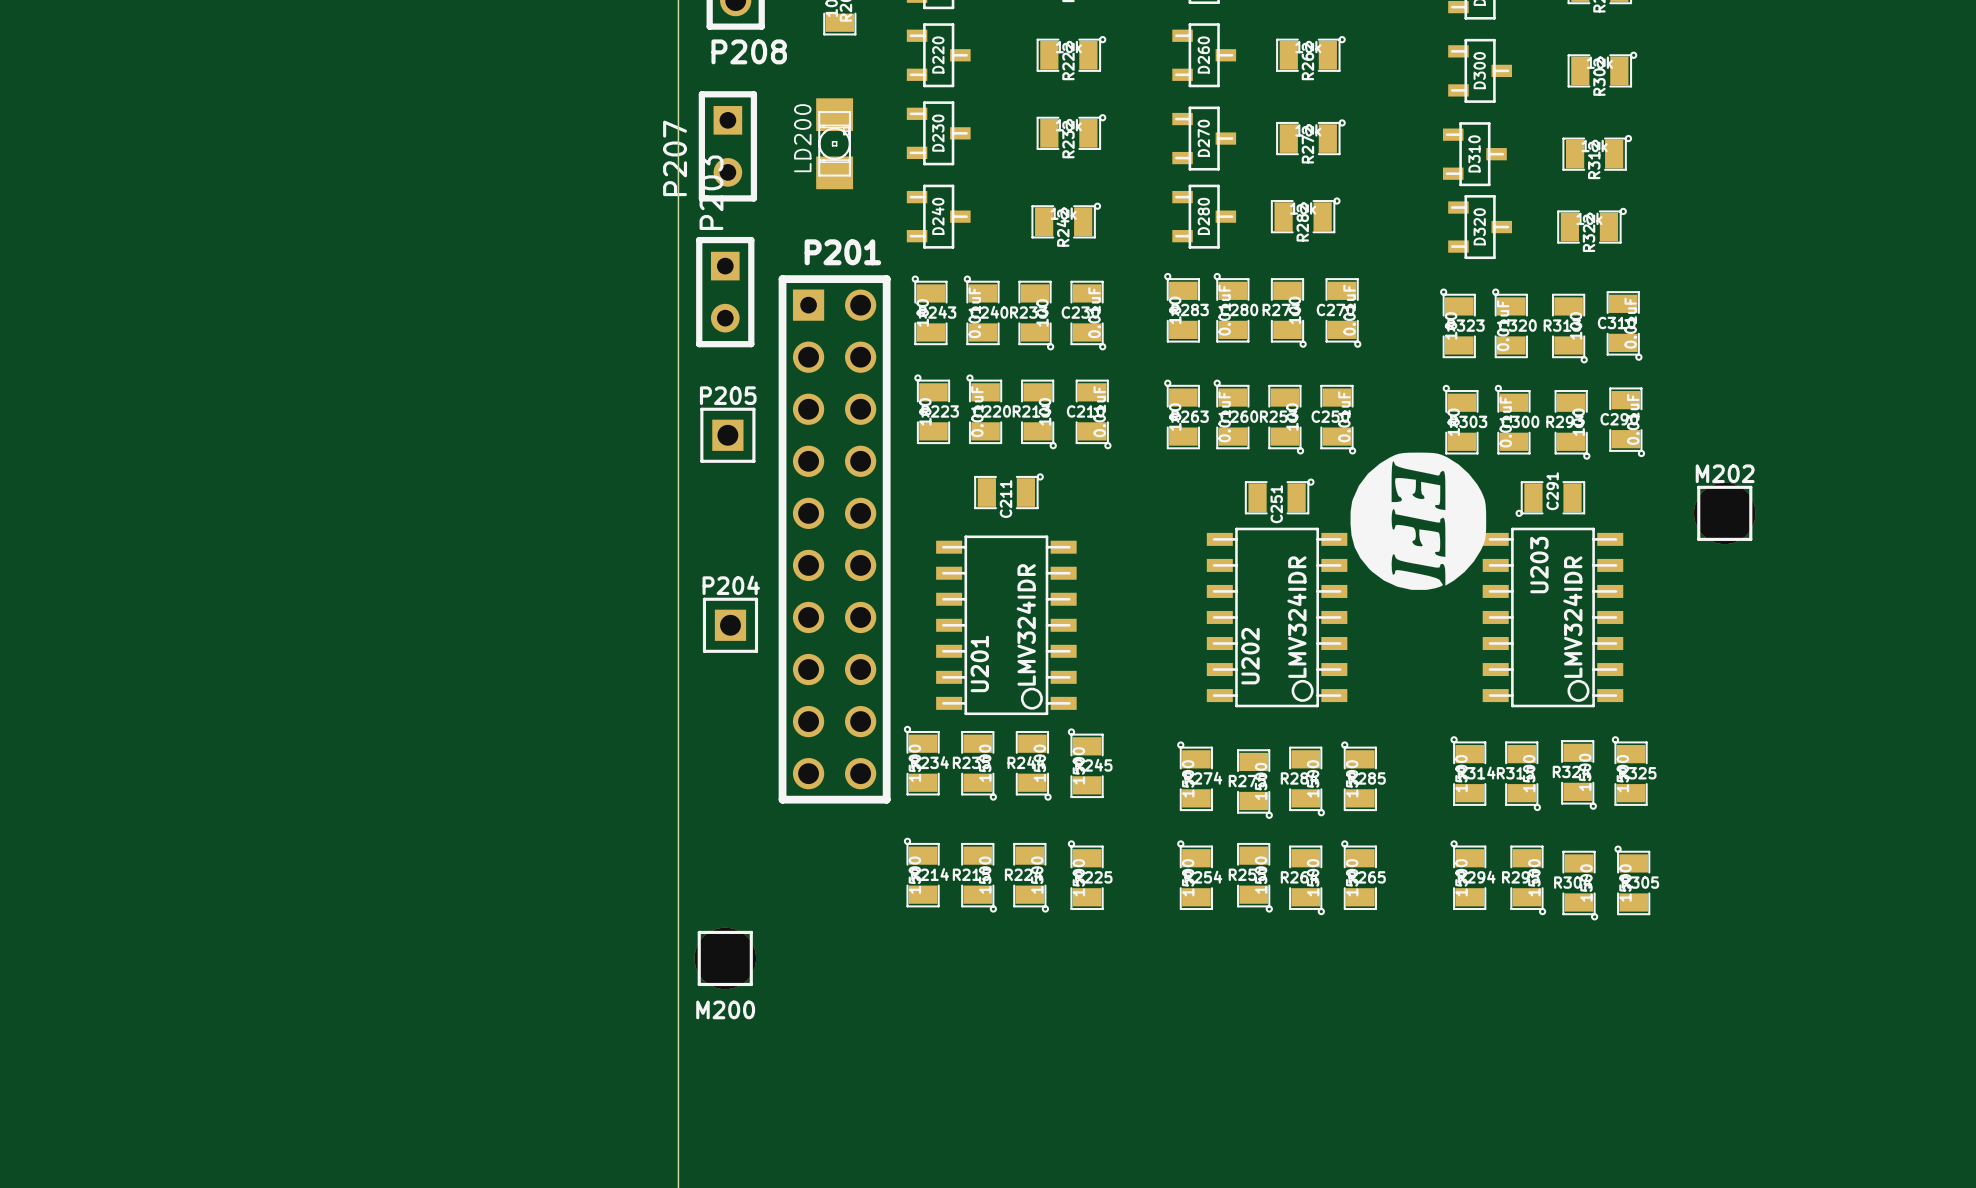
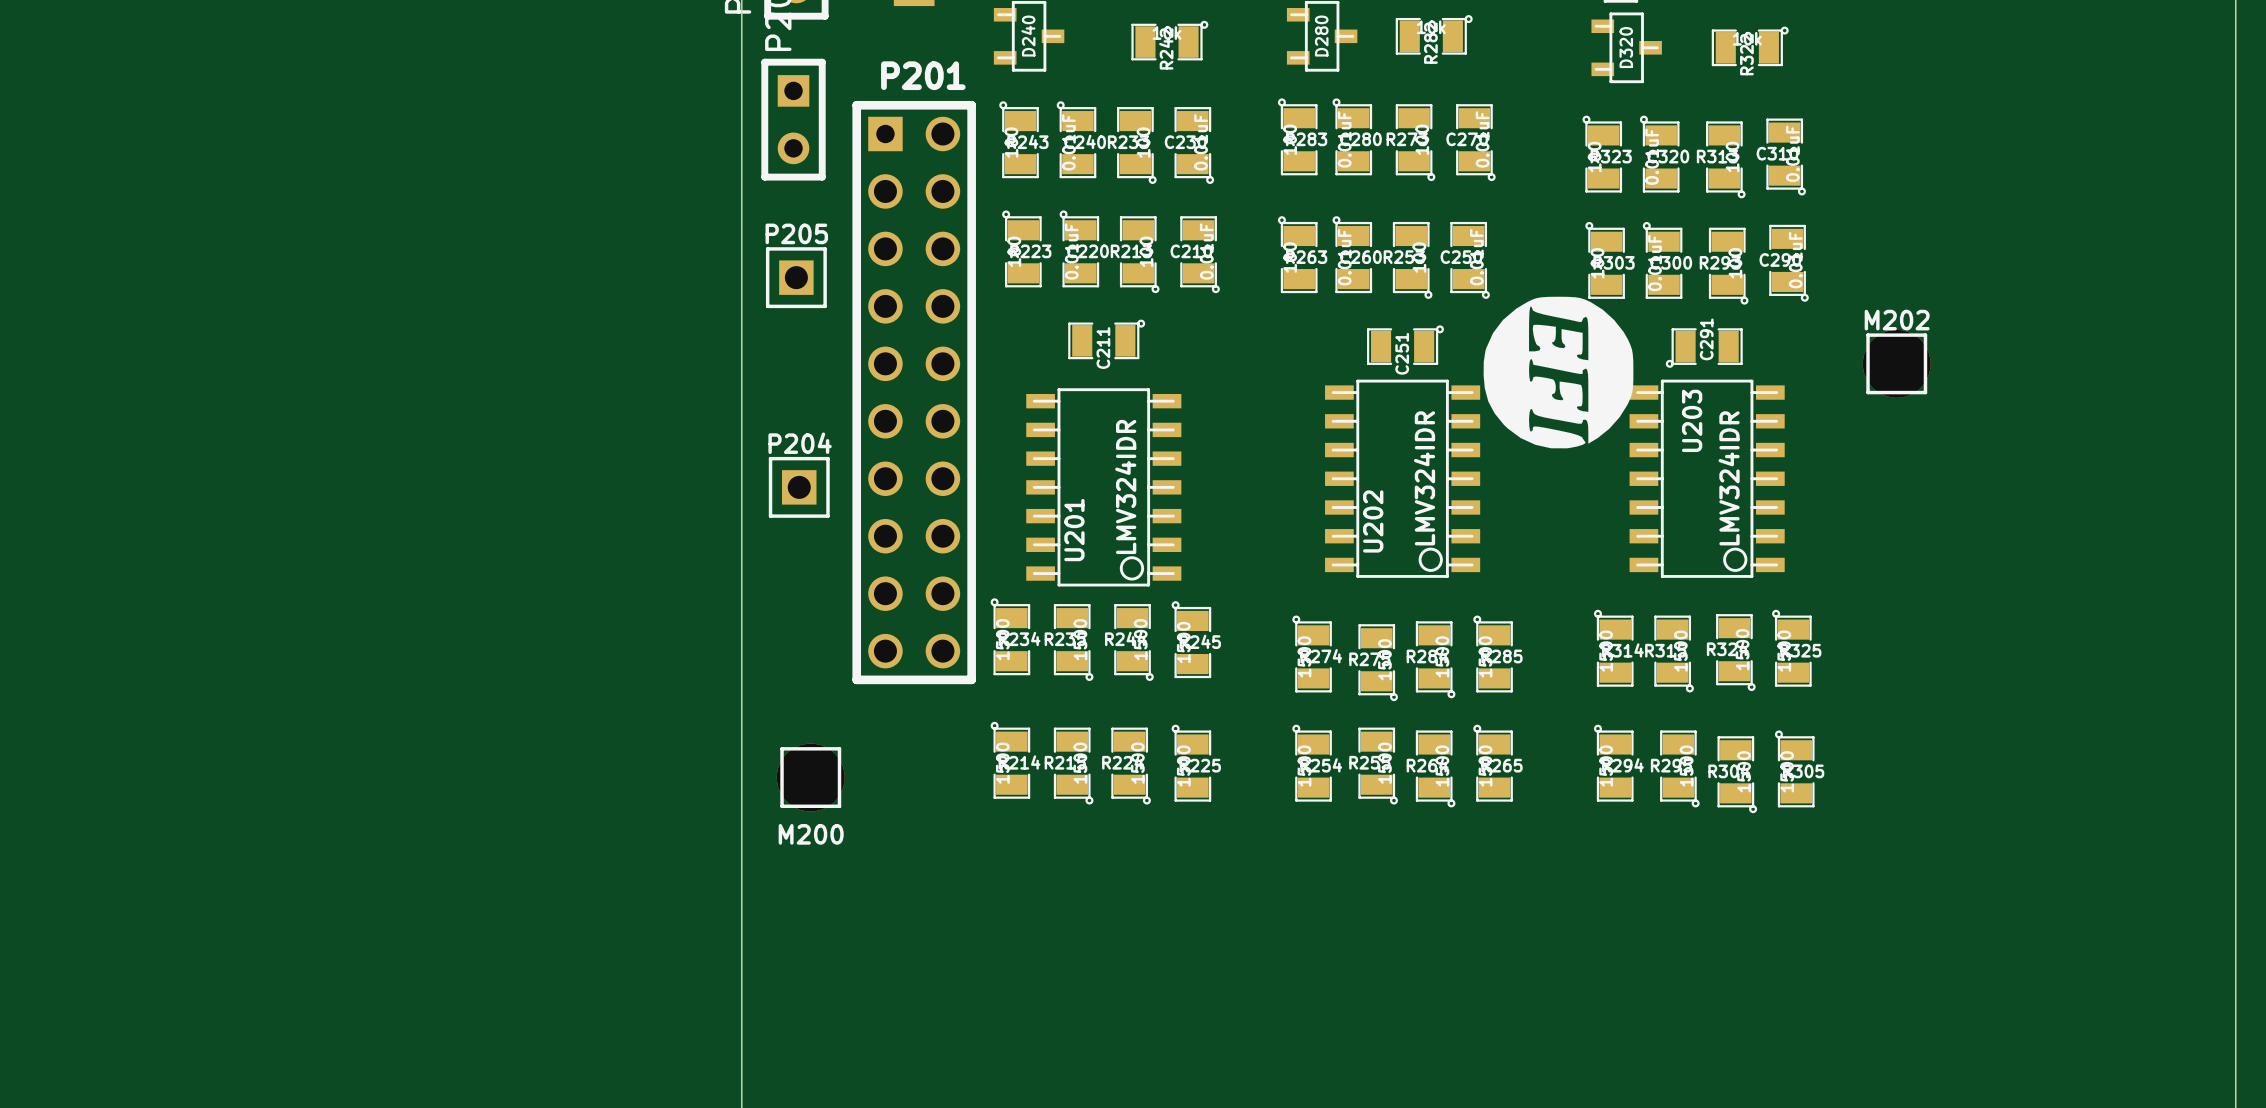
M200 position: (725, 958) -> (810, 777)

